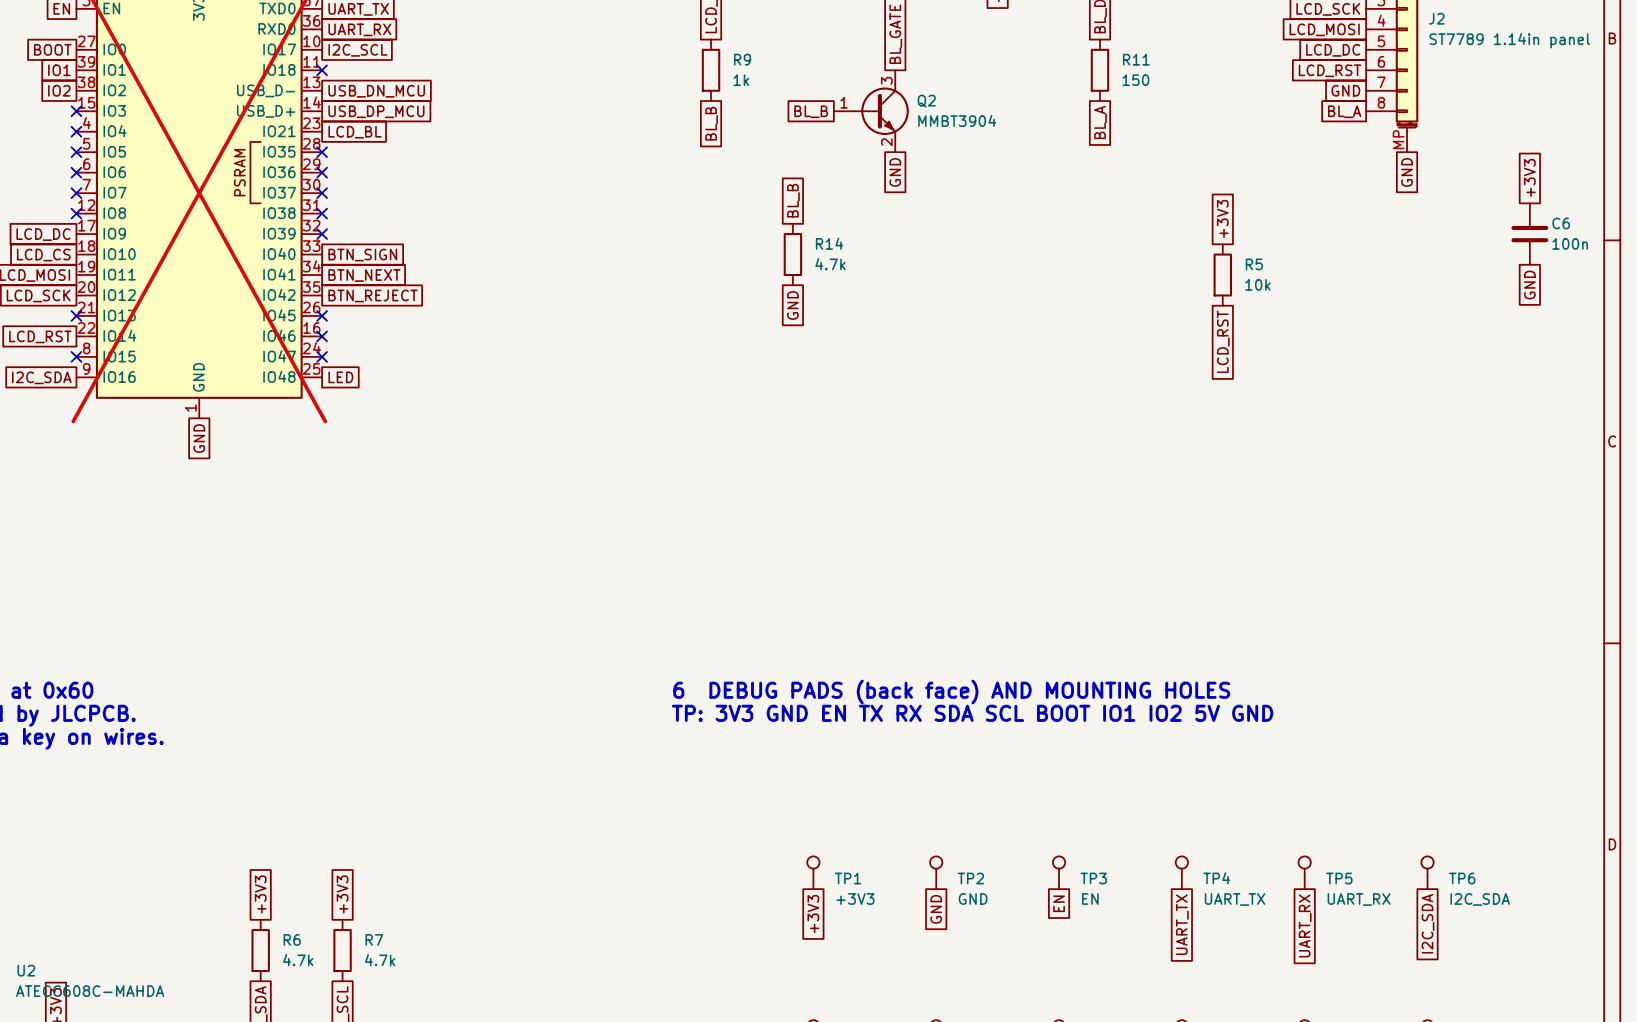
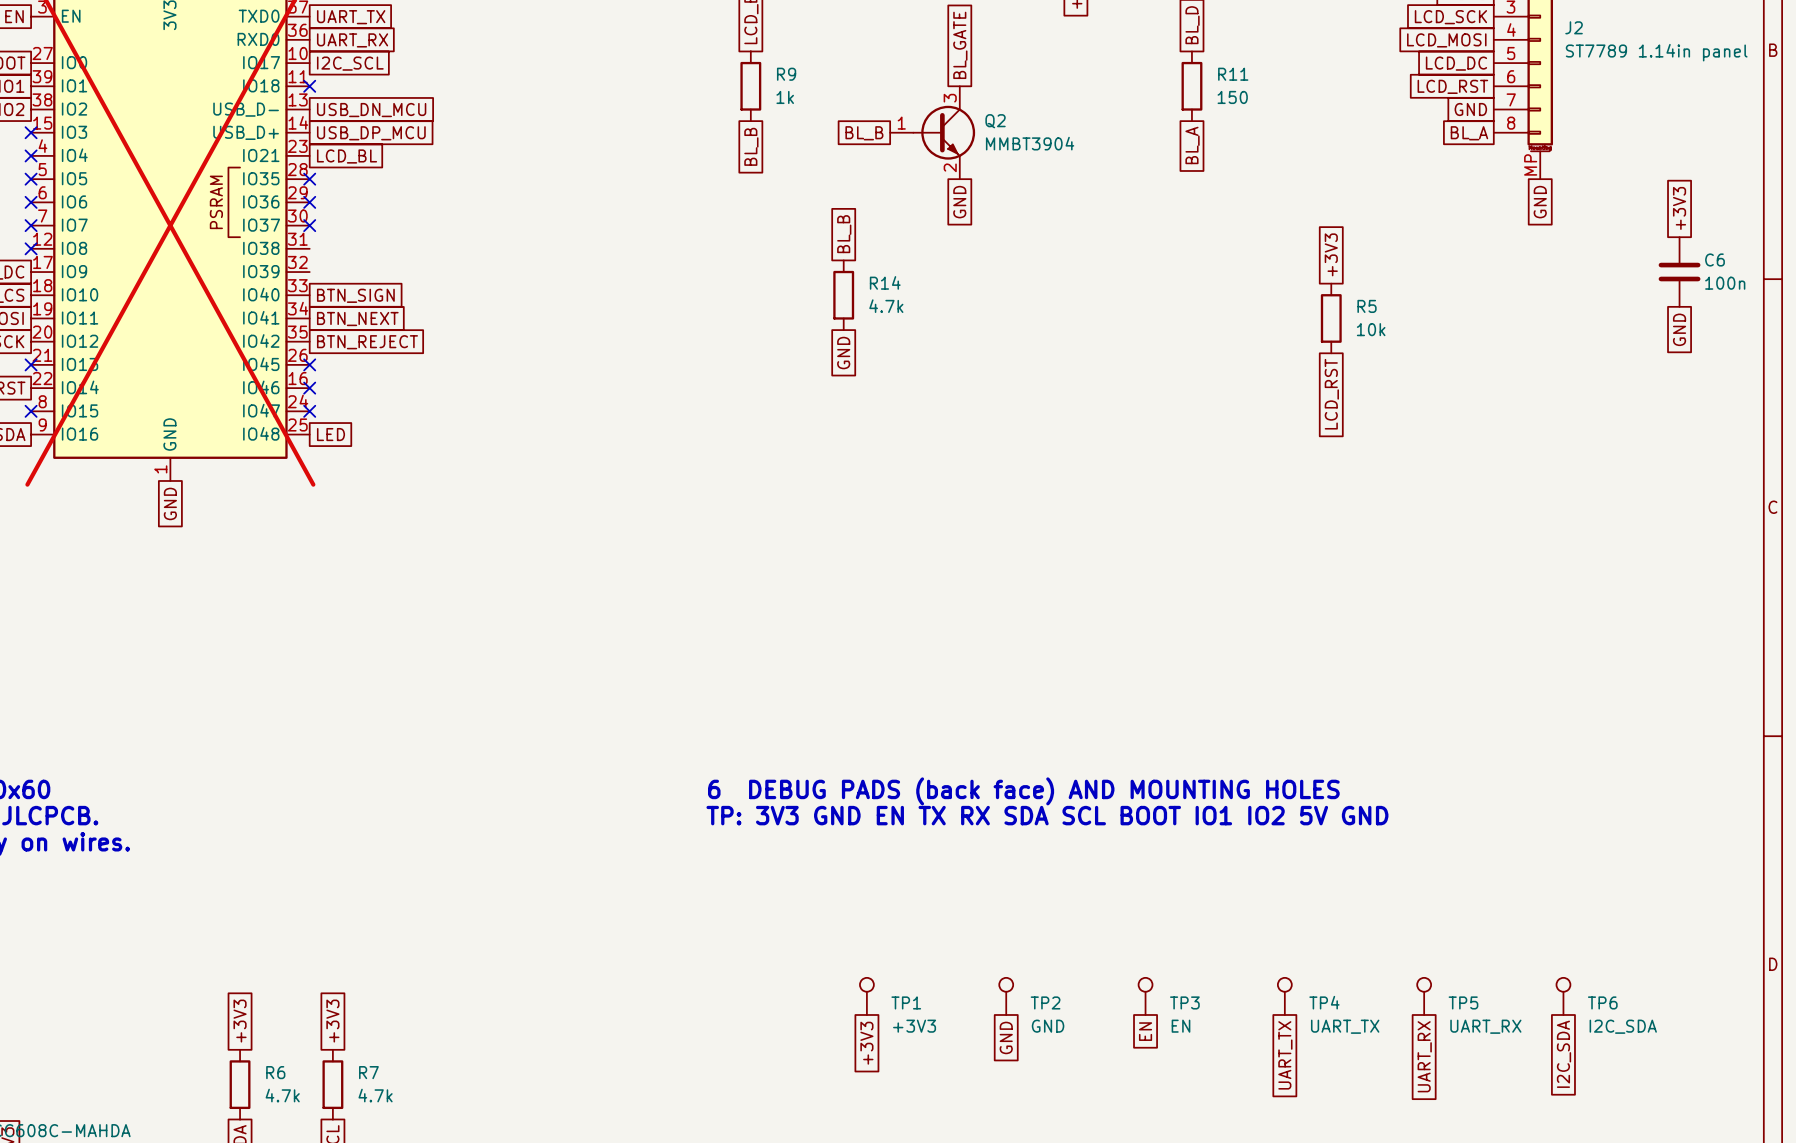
no-connect mark: (322, 213) -> none
no-connect mark: (322, 234) -> none

